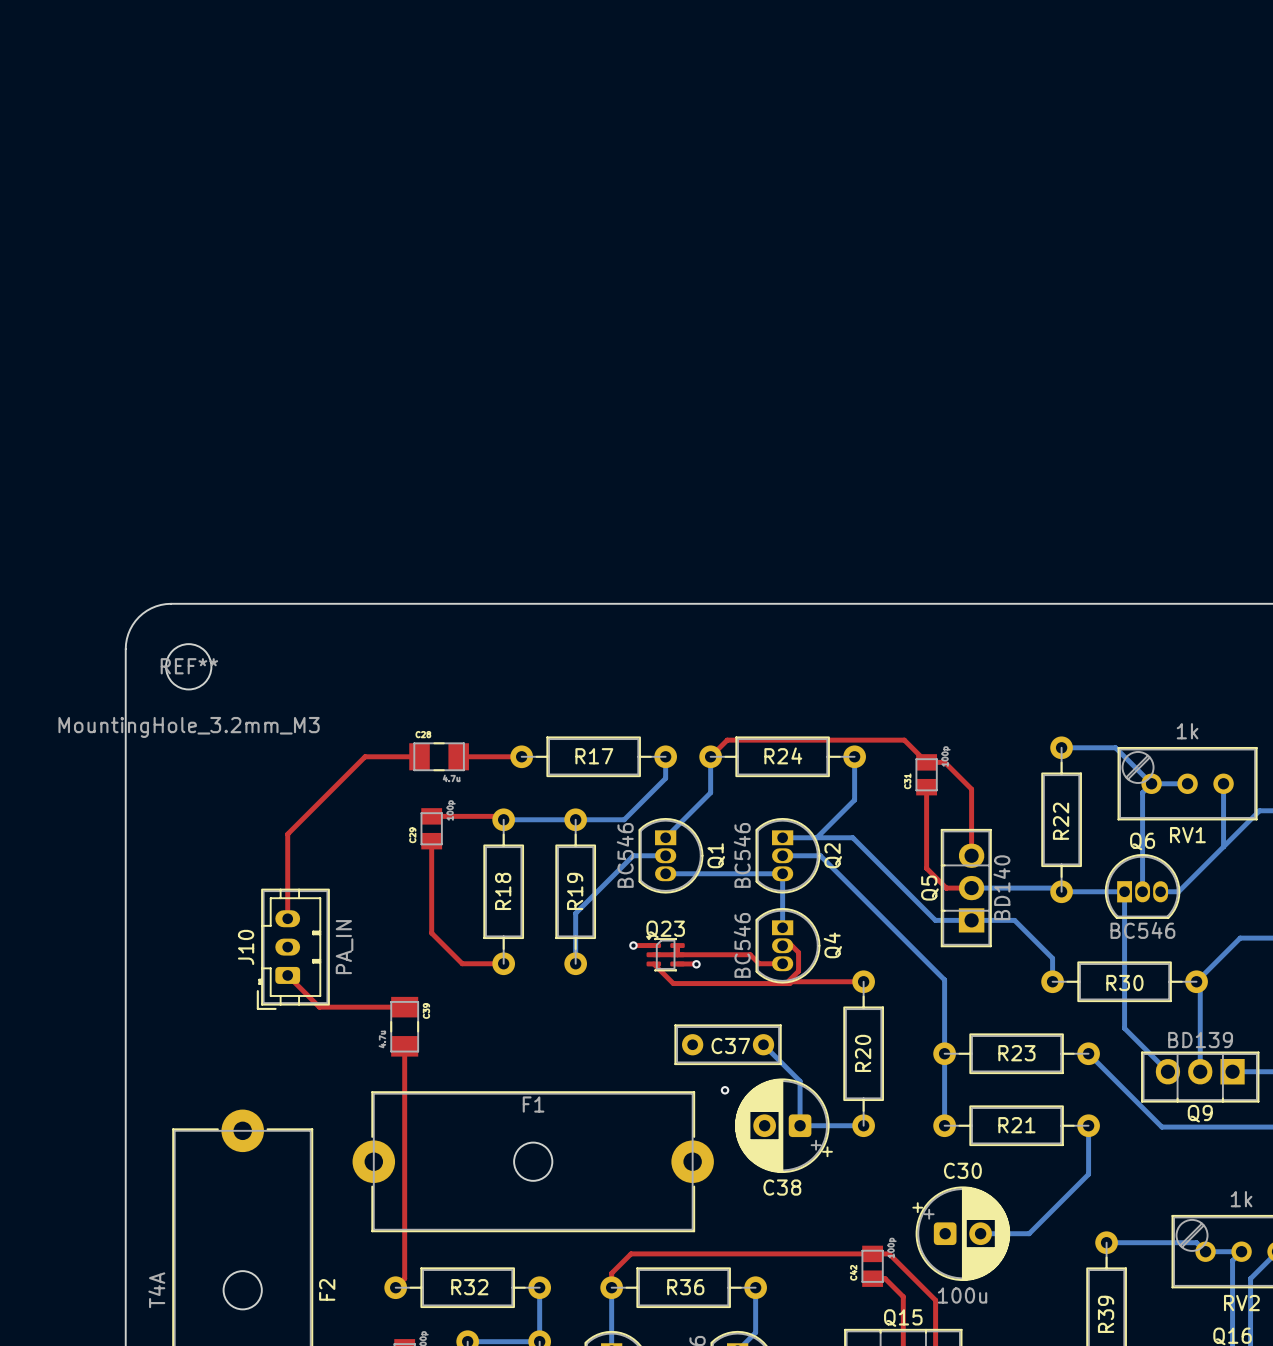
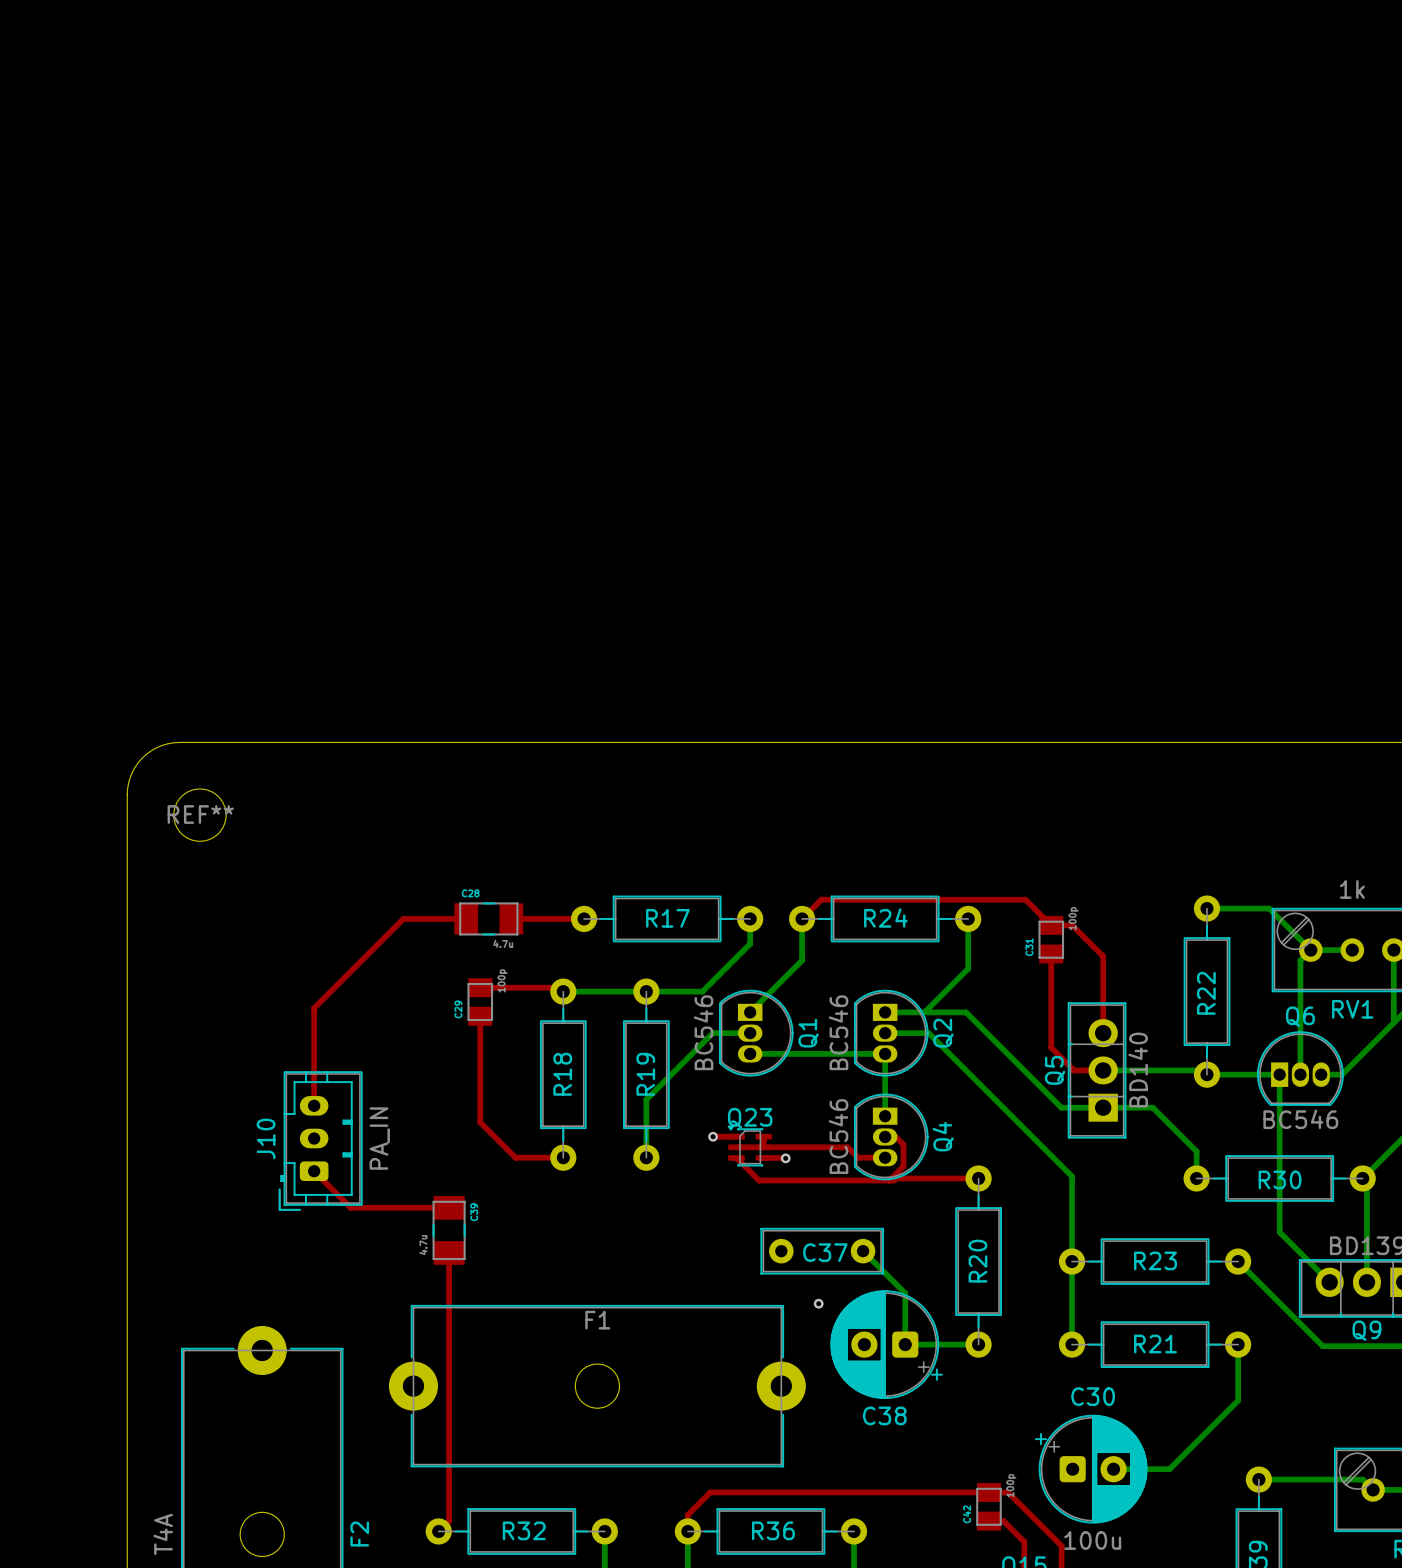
REF** value: MountingHole_3.2mm_M3 (189, 727) -> none

